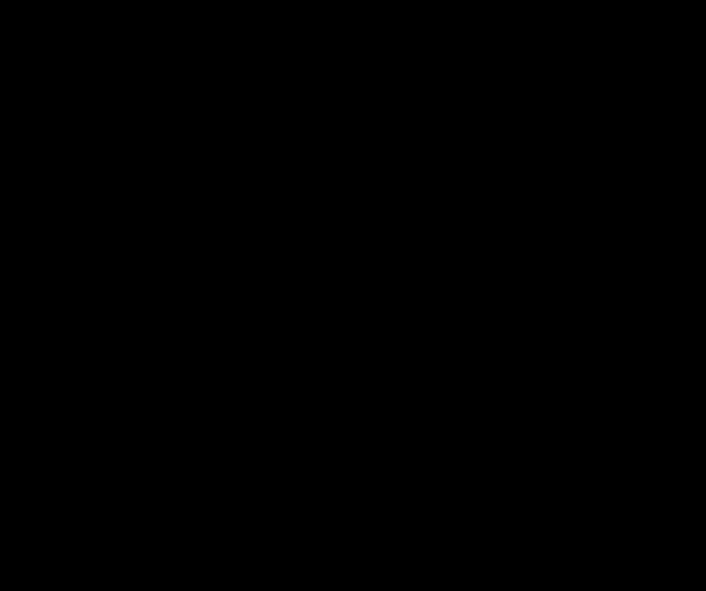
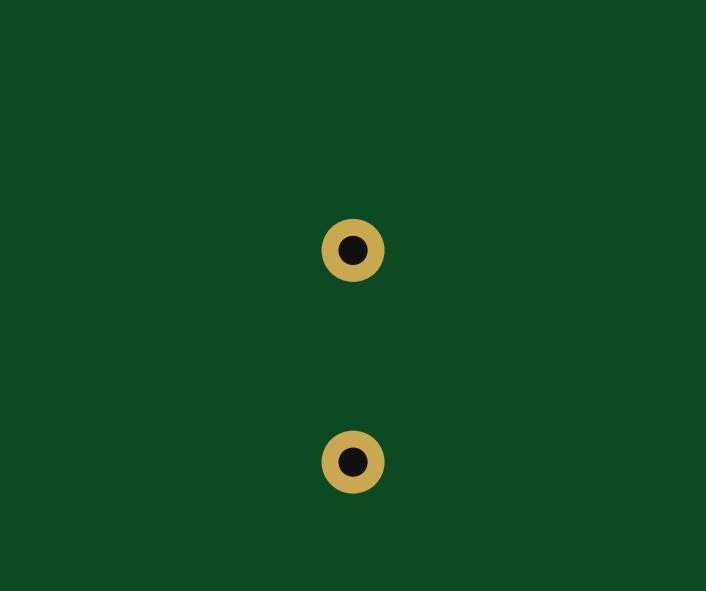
via: none -> (353, 250)
via: none -> (353, 462)

